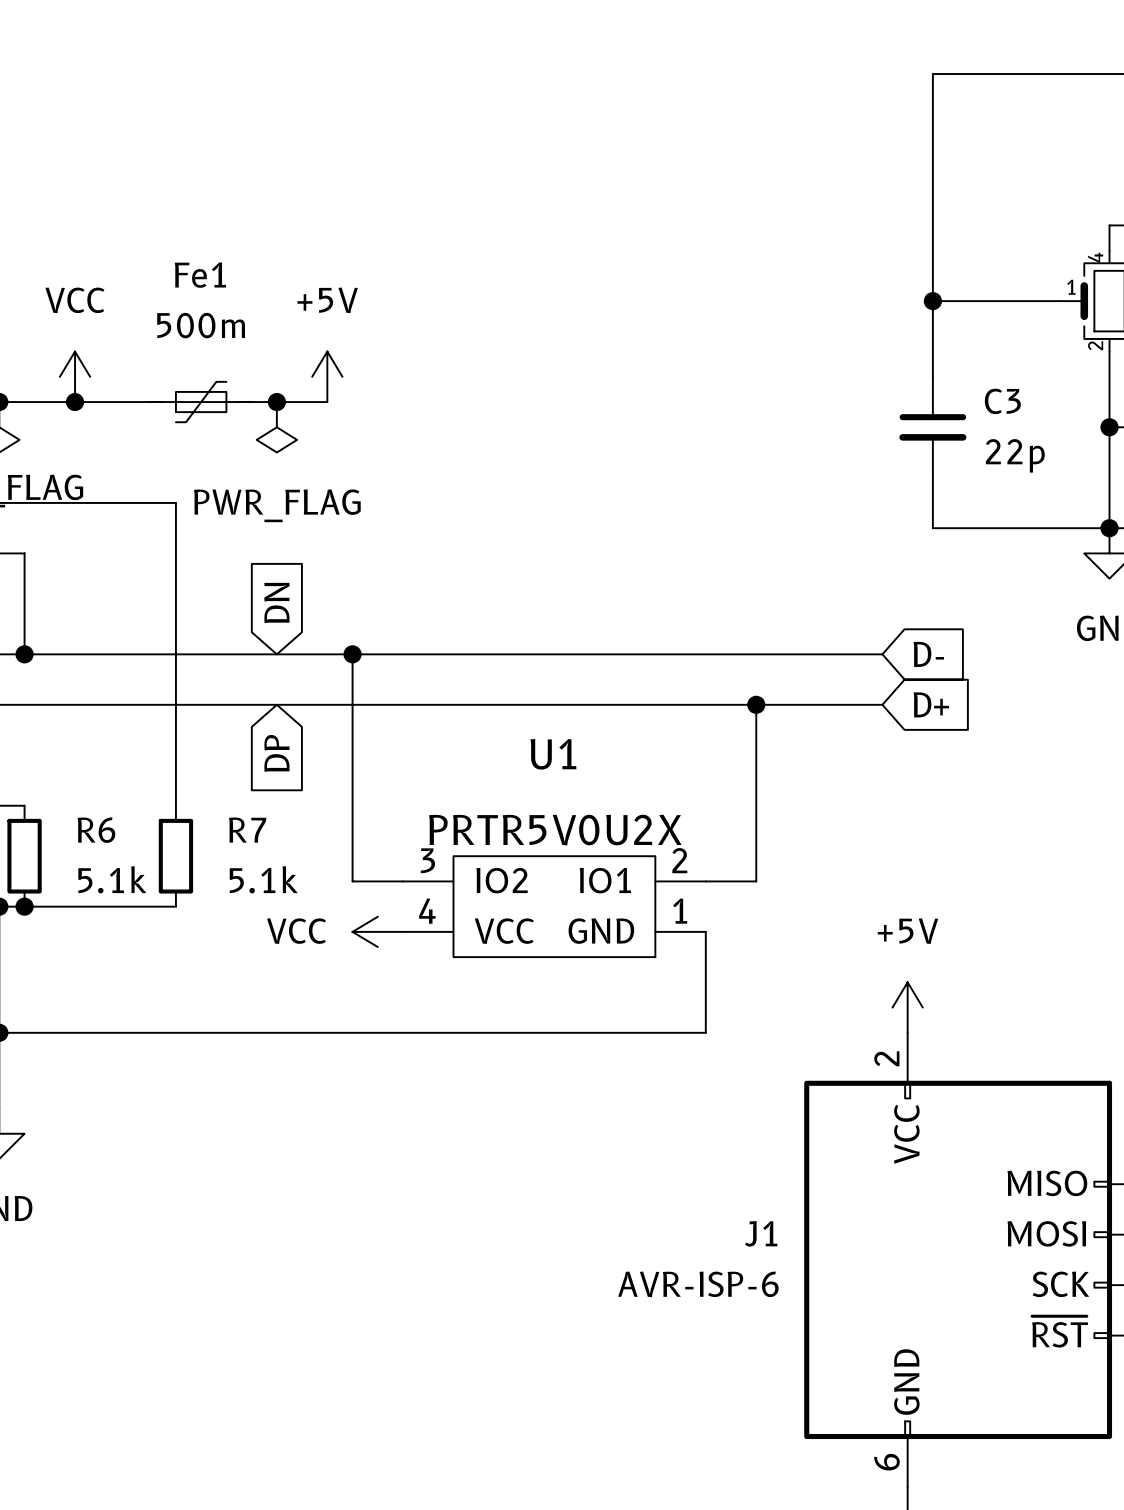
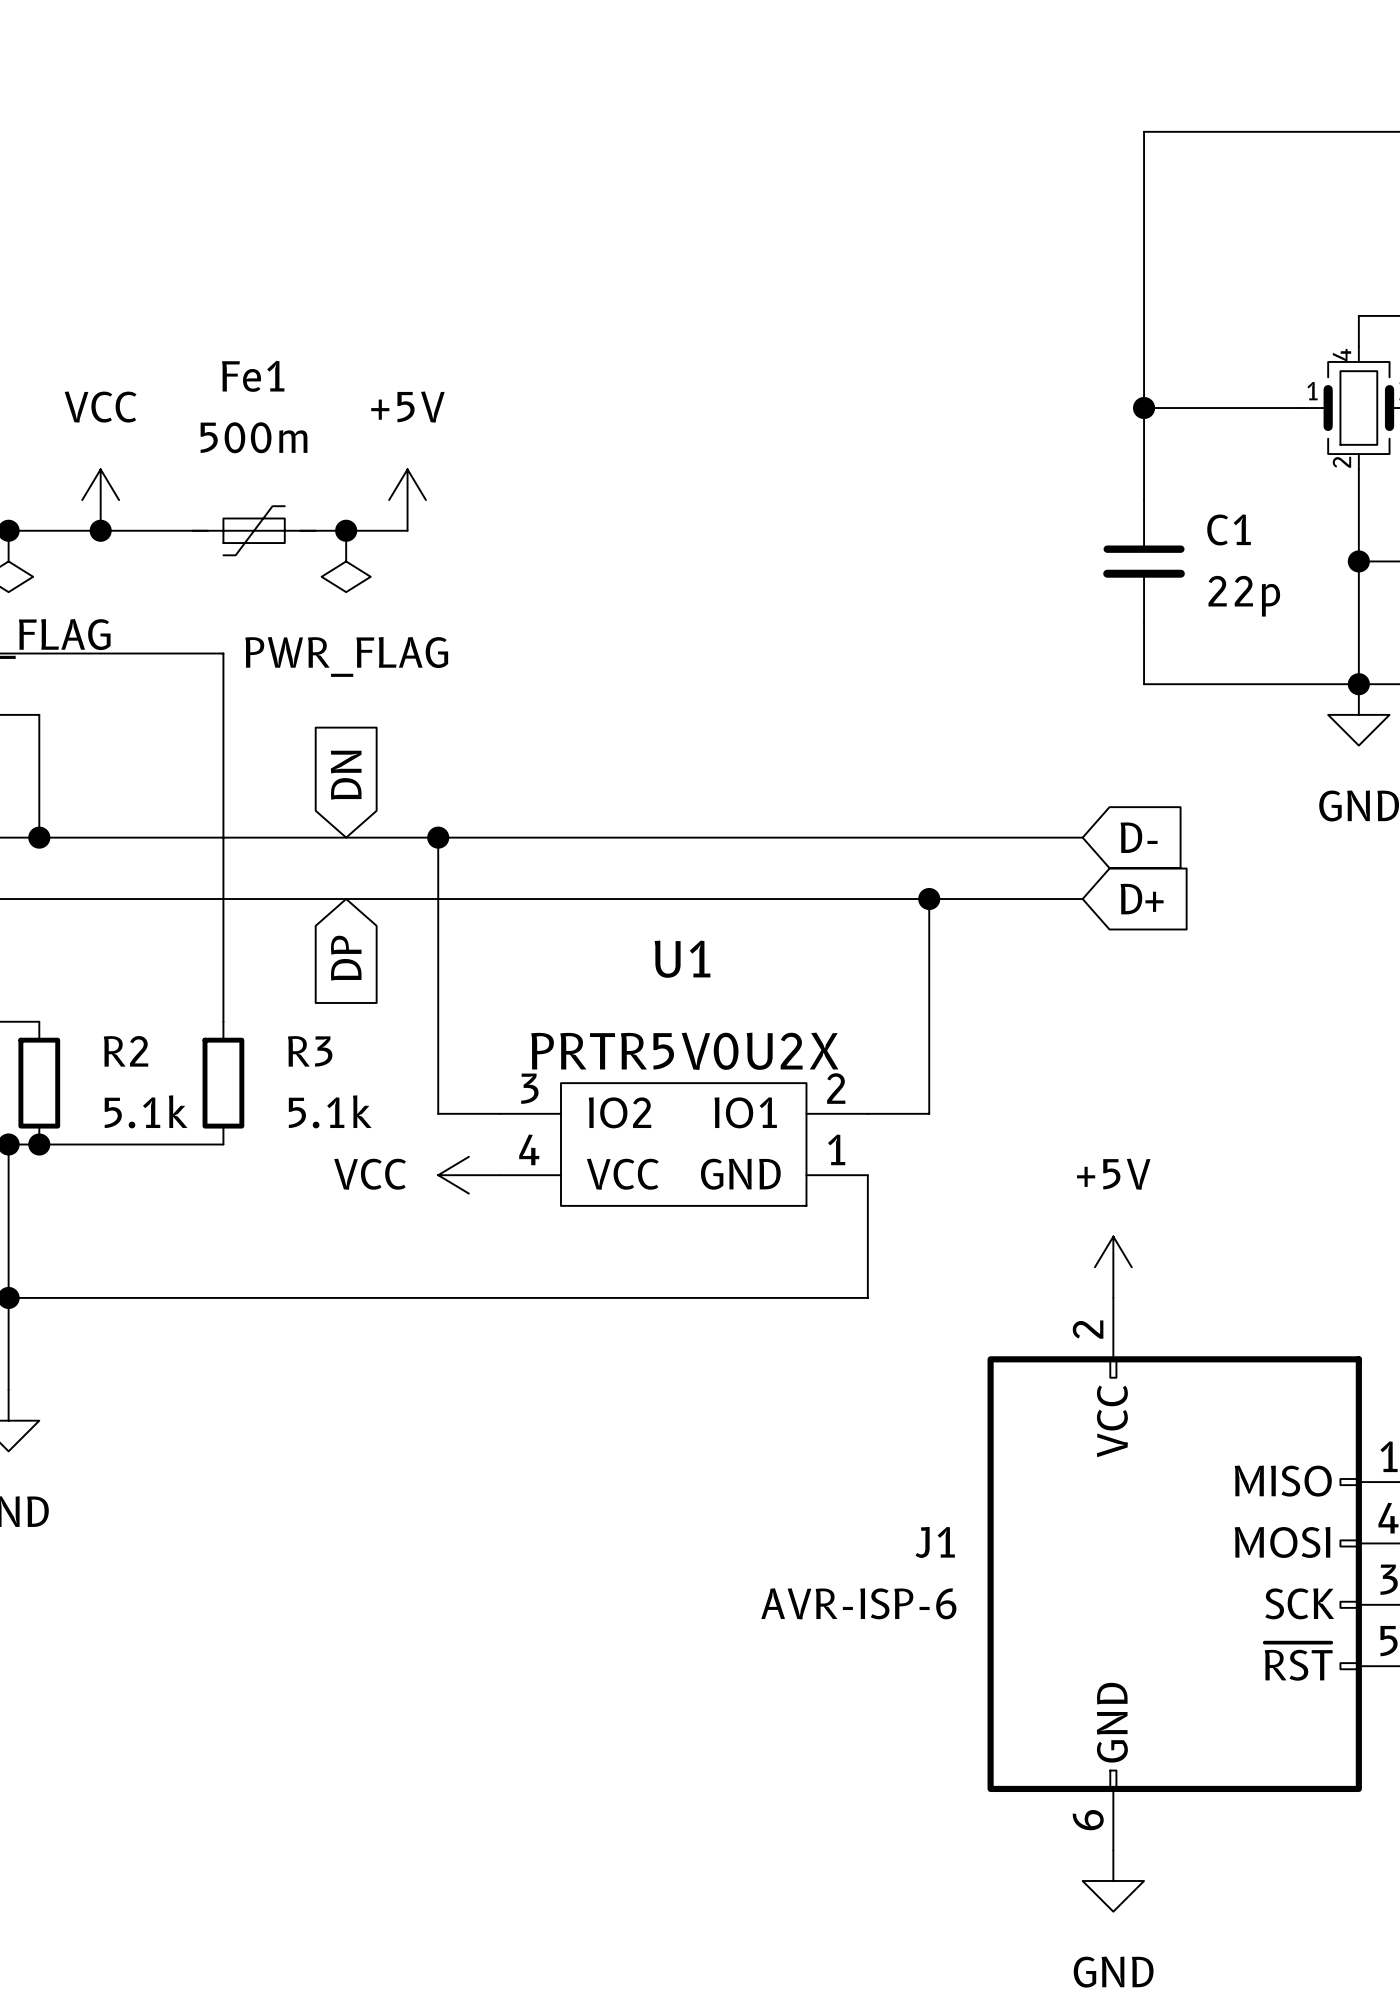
C3 name: C3 (1002, 401) -> C1 (1229, 529)
R6 name: R6 (96, 830) -> R2 (126, 1051)
R7 name: R7 (247, 830) -> R3 (310, 1051)

